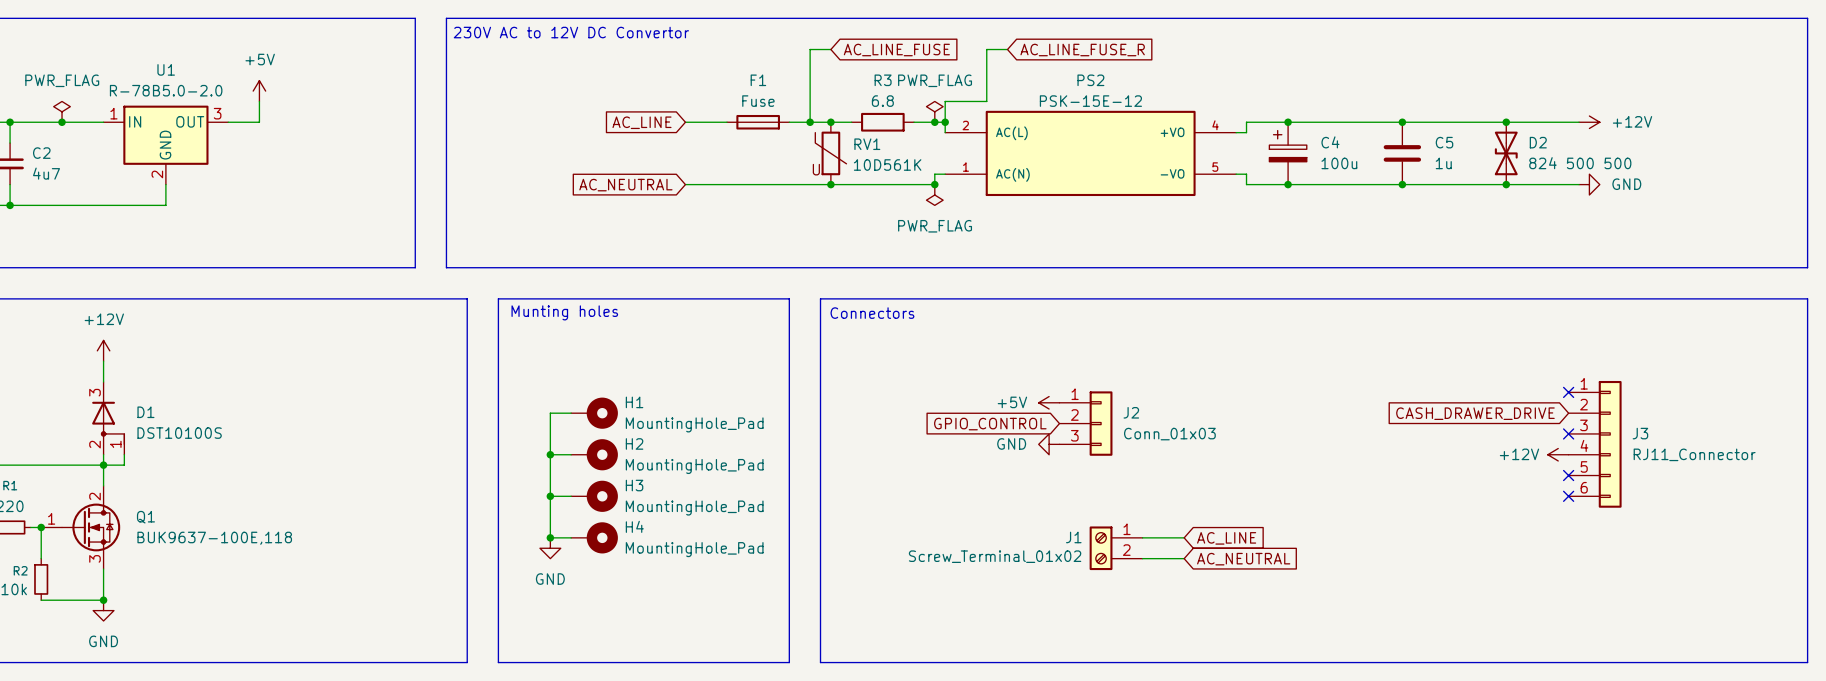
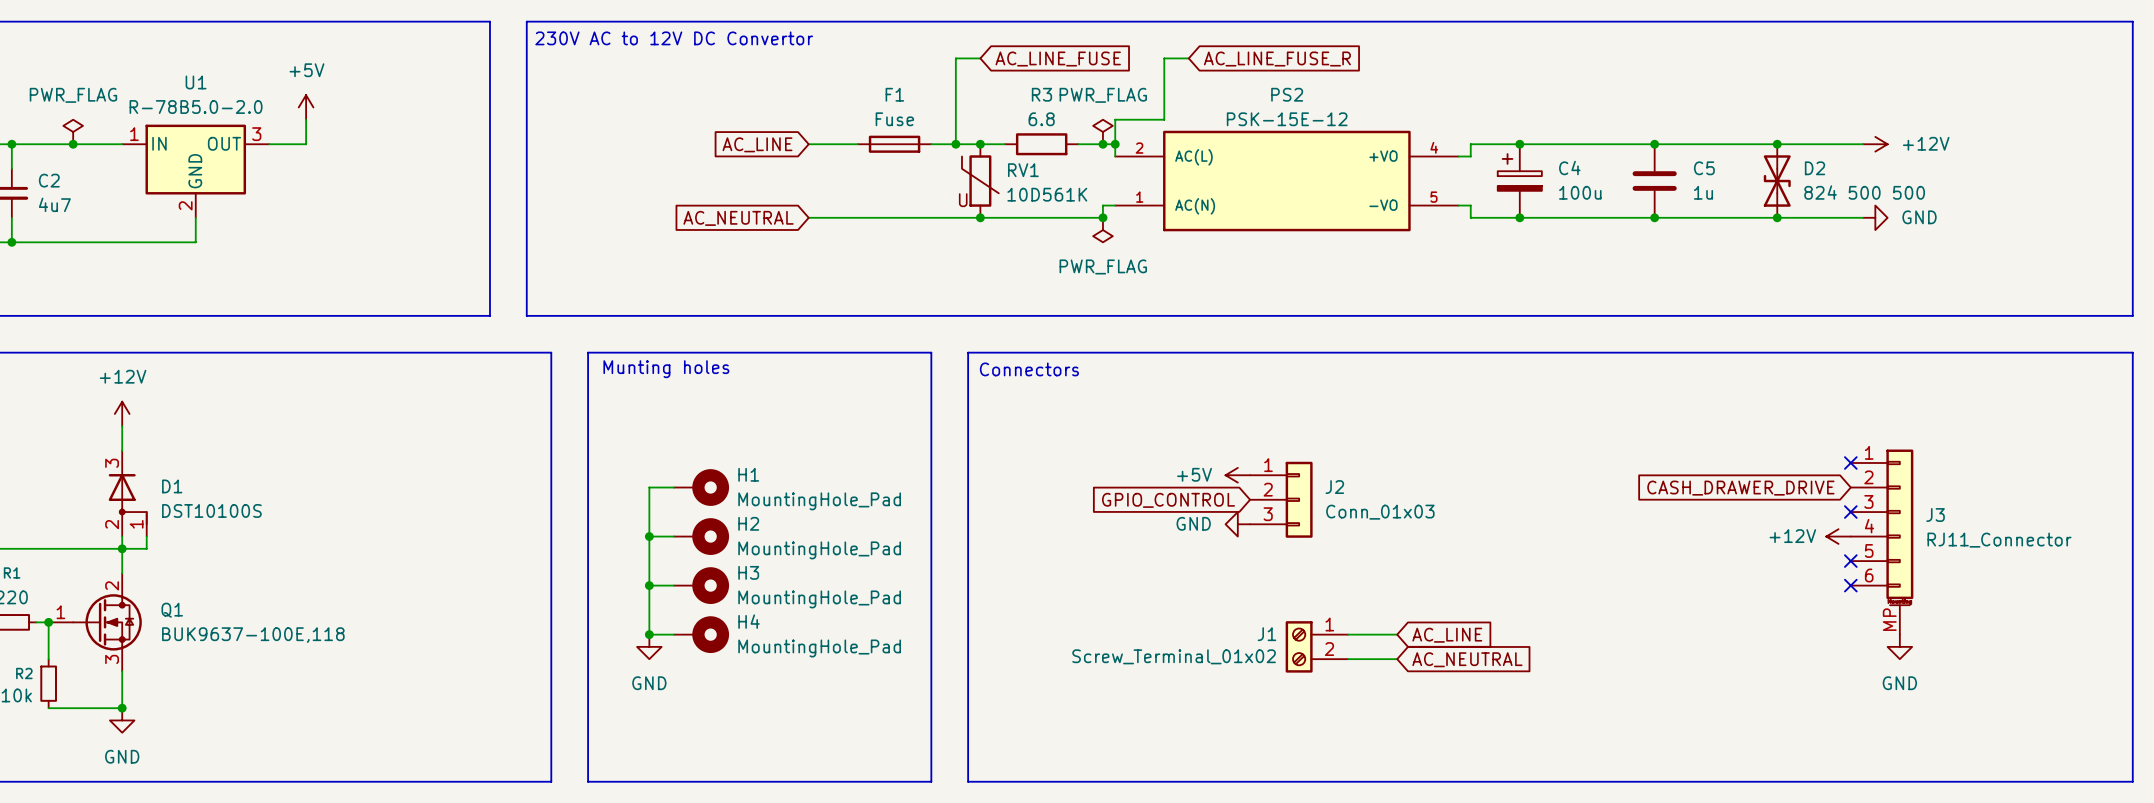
J3 symbol: [1568, 380, 1622, 508] -> [1850, 449, 1914, 635]
power symbol: none -> GND (1899, 646)

